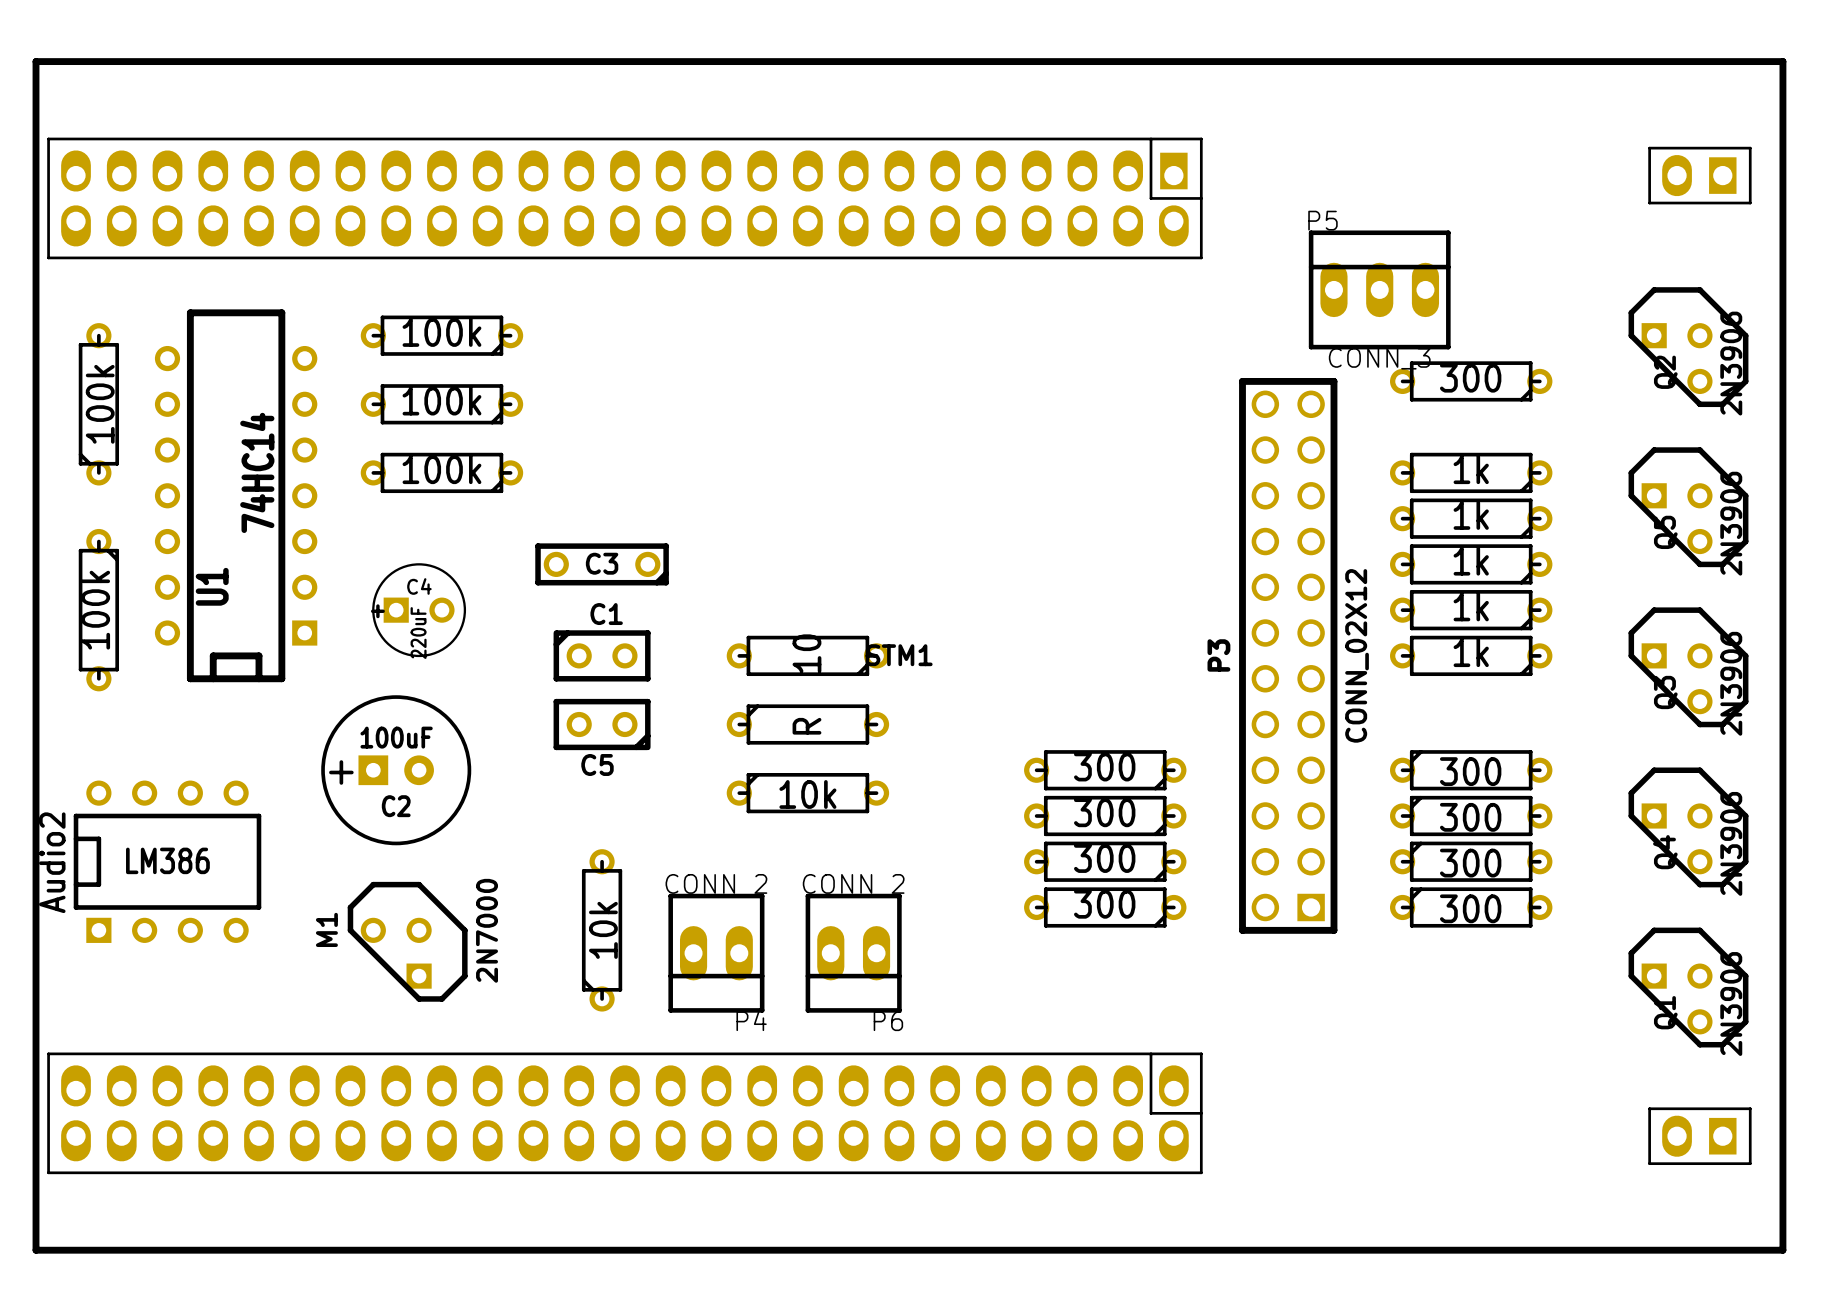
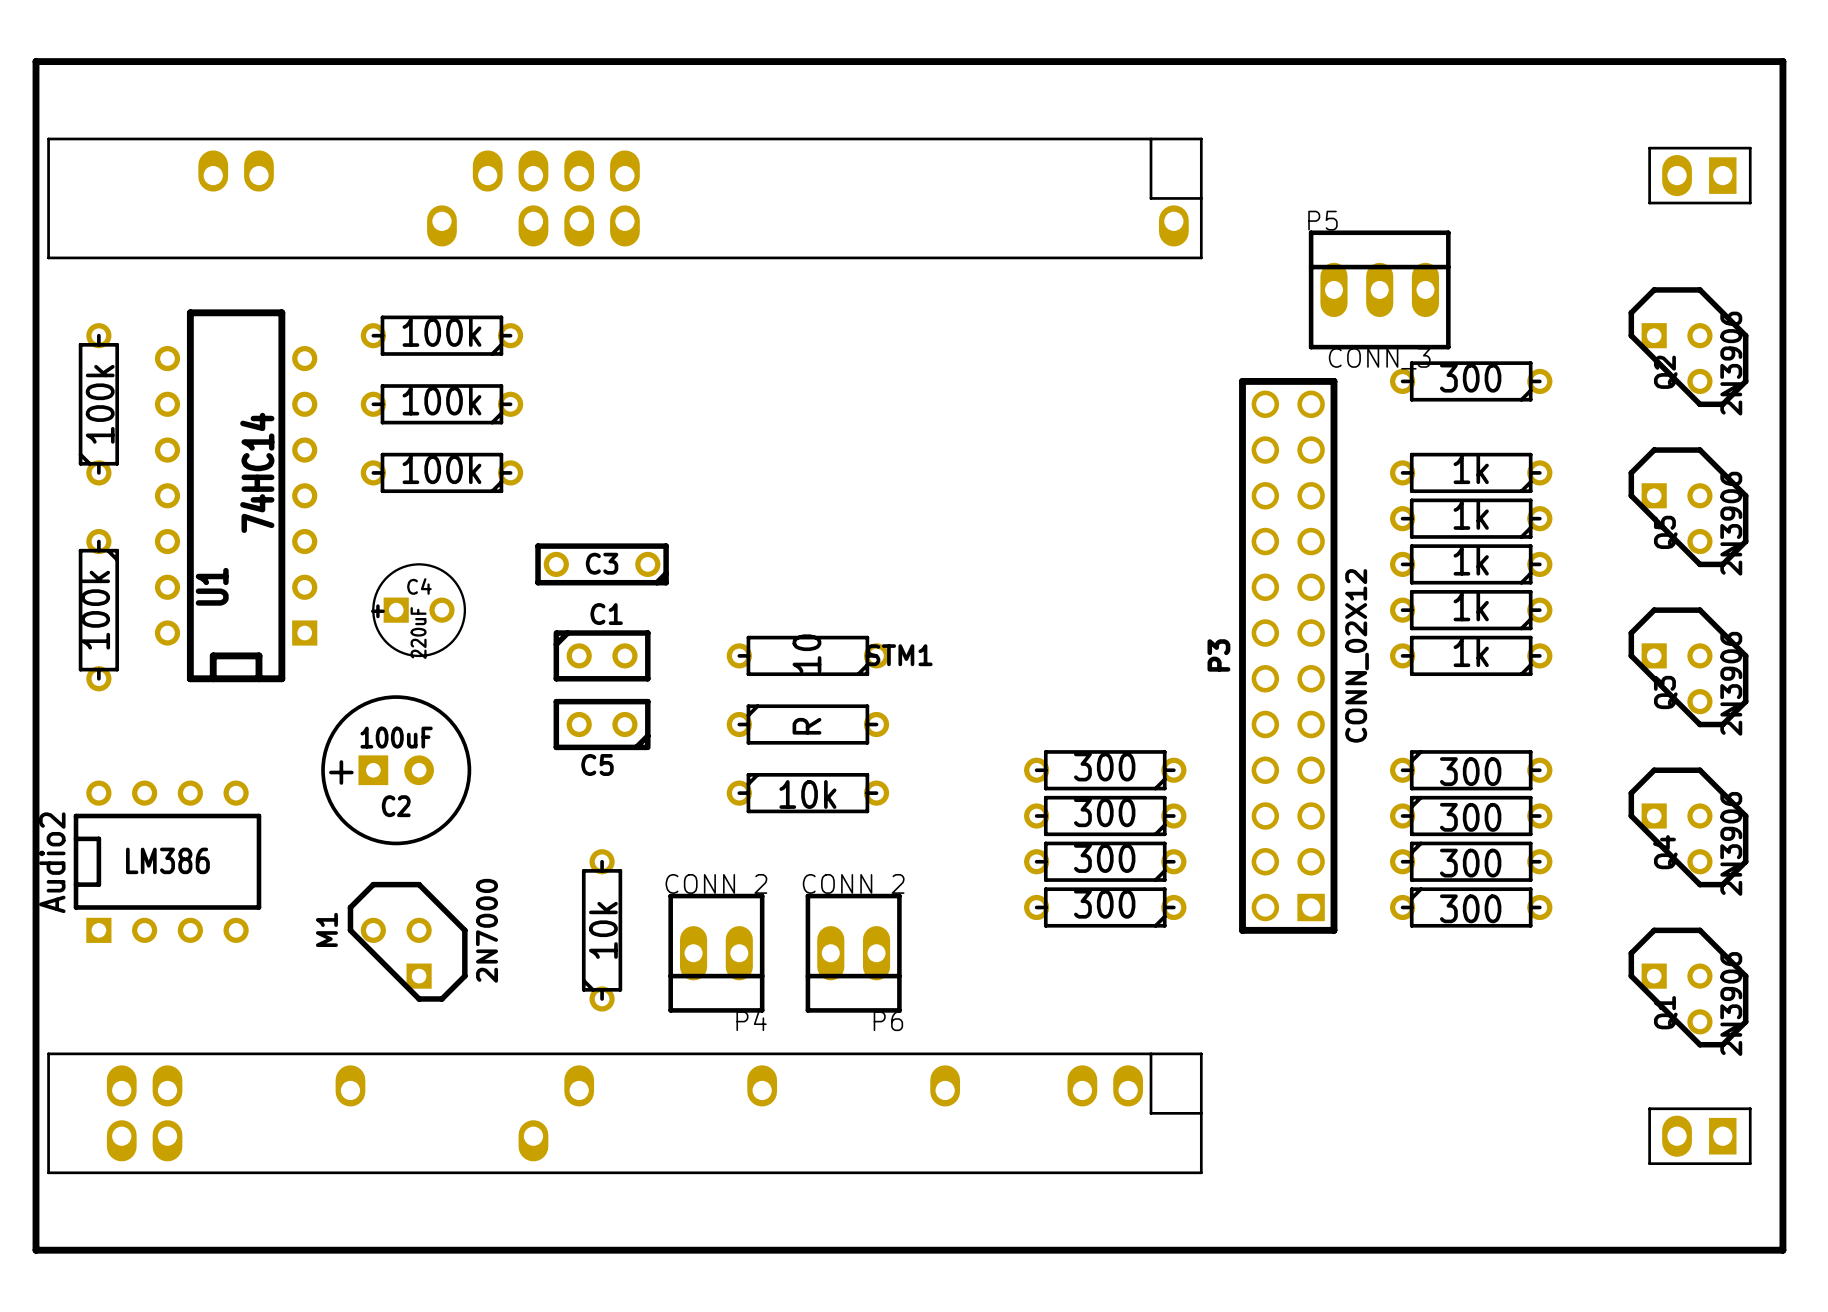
STM1 footprint: [32, 58, 1787, 1254] -> [32, 58, 1787, 1254]

